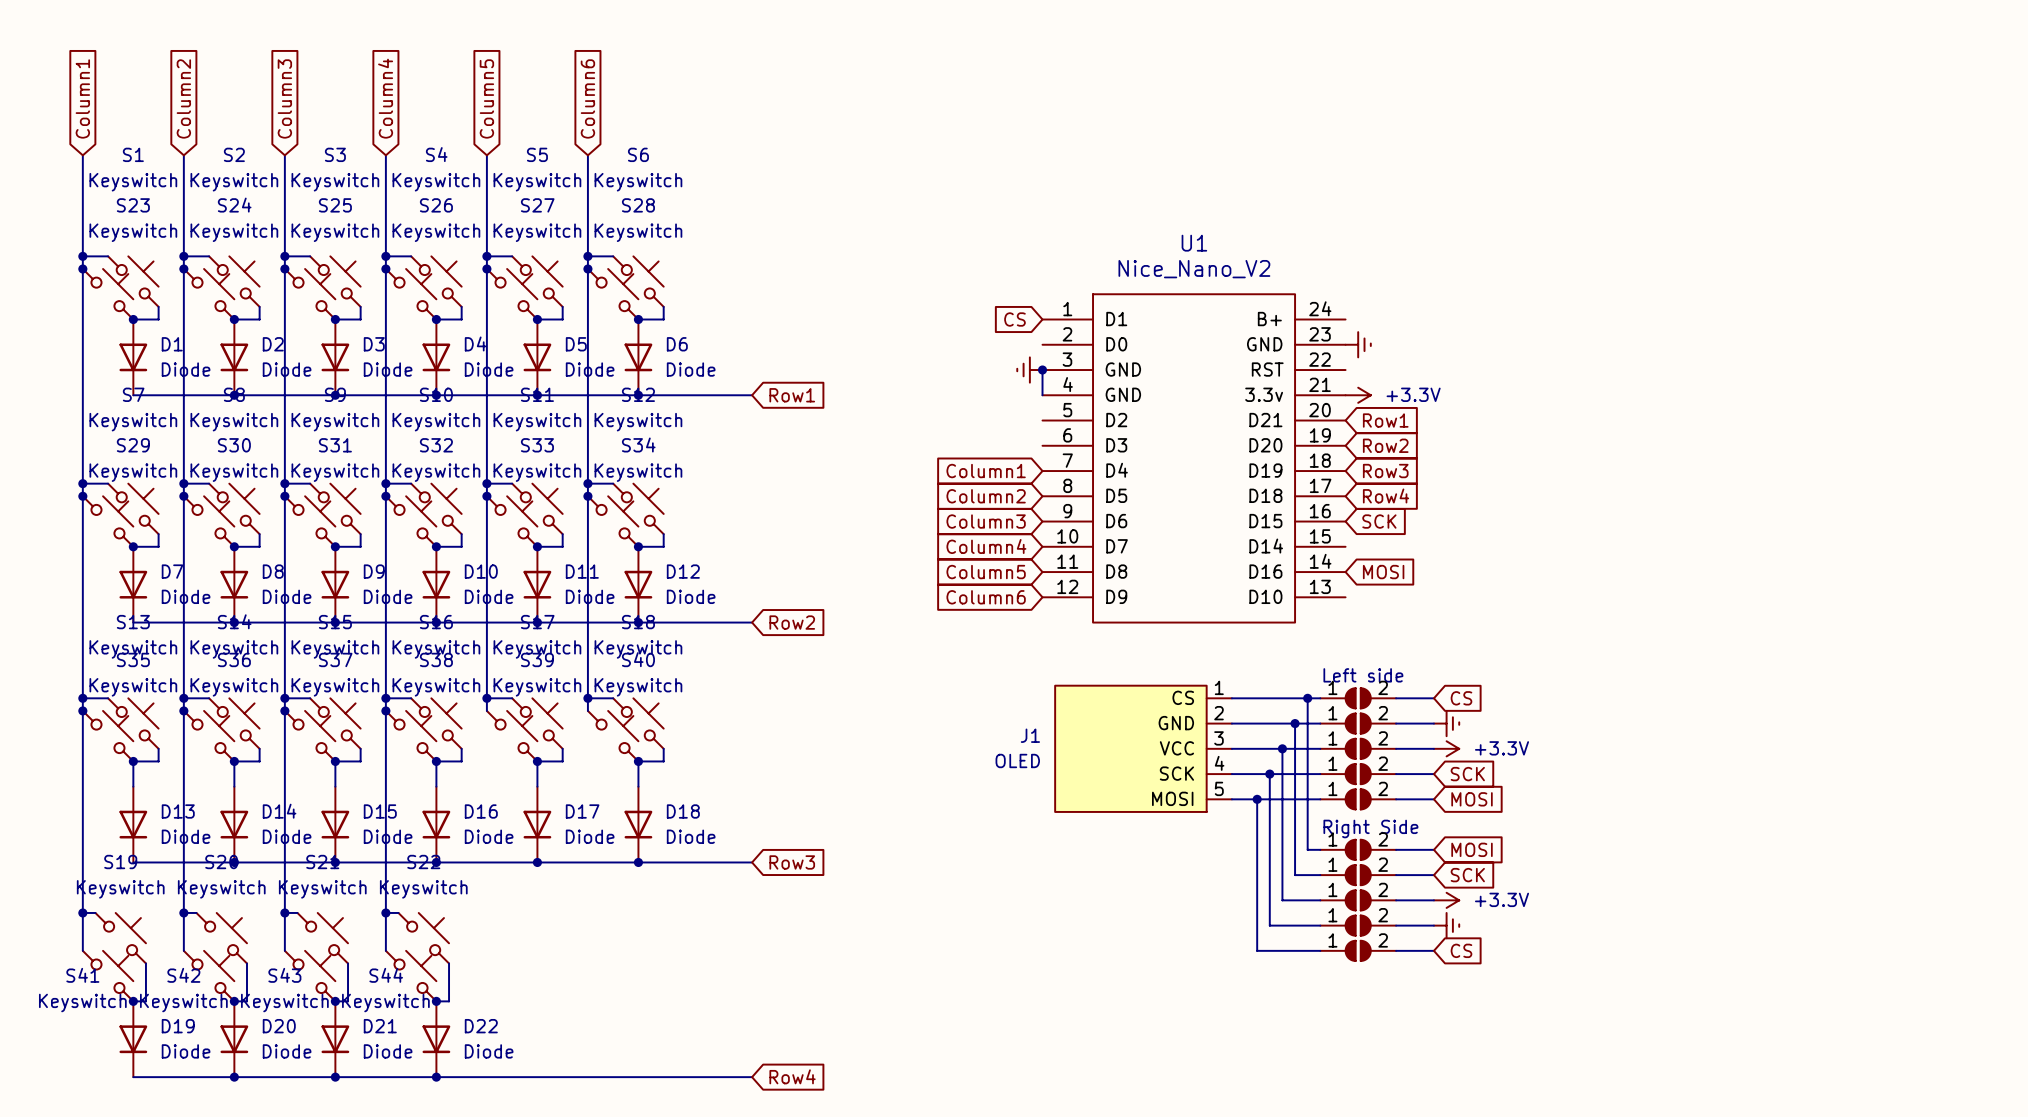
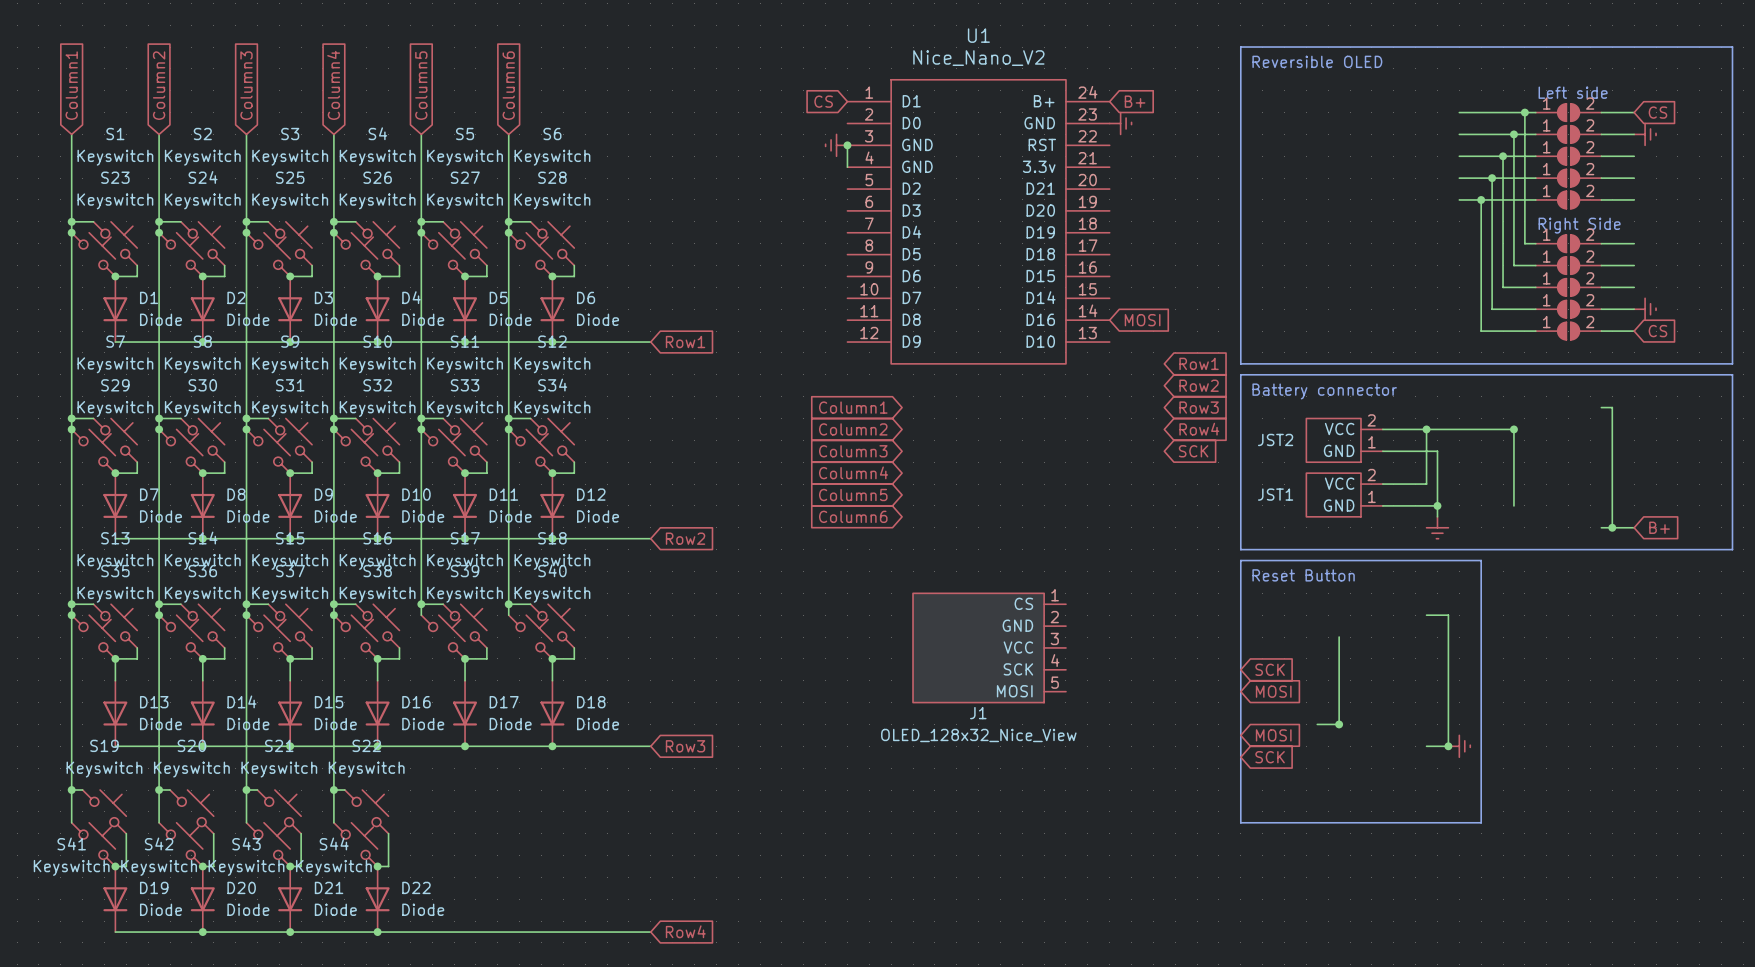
line: none -> (1240, 47) (1240, 363) (1732, 363) (1732, 47) (1240, 47)
text: none -> Reversible OLED (1317, 61)
text: none -> Left side (1573, 92)
global label: none -> B+ (1135, 101)
wire: none -> (1459, 112) (1535, 112)
wire: none -> (1524, 112) (1524, 243) (1535, 243)
junction: none -> (1524, 112)
part: none -> (1568, 112)
wire: none -> (1601, 112) (1634, 112)
global label: none -> CS (1657, 112)
power symbol: none -> (1120, 123)
wire: none -> (1459, 134) (1535, 134)
wire: none -> (1513, 134) (1513, 265) (1535, 265)
junction: none -> (1513, 134)
part: none -> (1568, 134)
wire: none -> (1601, 134) (1634, 134)
power symbol: none -> (1645, 134)
power symbol: none -> (836, 145)
junction: none -> (847, 145)
wire: none -> (1459, 156) (1535, 156)
wire: none -> (1503, 156) (1503, 287) (1535, 287)
junction: none -> (1503, 156)
part: none -> (1568, 156)
wire: none -> (1601, 156) (1634, 156)
wire: none -> (1459, 178) (1535, 178)
wire: none -> (1492, 178) (1492, 309) (1535, 309)
junction: none -> (1492, 178)
part: none -> (1568, 178)
wire: none -> (1601, 178) (1634, 178)
wire: none -> (1459, 199) (1535, 199)
wire: none -> (1481, 199) (1481, 331) (1535, 331)
junction: none -> (1481, 199)
part: none -> (1568, 199)
wire: none -> (1601, 199) (1634, 199)
text: none -> Right Side (1579, 225)
part: none -> (1568, 243)
wire: none -> (1601, 243) (1634, 243)
part: none -> (1568, 265)
wire: none -> (1601, 265) (1634, 265)
global label position: CS (1014, 319) -> CS (823, 101)
part: none -> (1568, 287)
wire: none -> (1601, 287) (1634, 287)
power symbol: (1358, 344) -> none
part: none -> (1568, 309)
wire: none -> (1601, 309) (1634, 309)
power symbol: none -> (1645, 309)
power symbol: (1029, 370) -> none
wire: (1042, 370) (1042, 395) -> (847, 145) (847, 167)
junction: (1042, 370) -> none
part: none -> (1568, 331)
wire: none -> (1601, 331) (1634, 331)
global label: none -> CS (1657, 331)
power symbol: +3.3V (1358, 395) -> none
line: none -> (1240, 374) (1240, 549) (1732, 549) (1732, 374) (1240, 374)
text: none -> Battery connector (1324, 391)
U1 position: (1194, 458) -> (978, 221)
wire: none -> (1601, 407) (1612, 407) (1612, 527)
wire: none -> (1382, 429) (1513, 429) (1513, 505)
wire: none -> (1426, 429) (1426, 484) (1382, 484)
junction: none -> (1426, 429)
junction: none -> (1513, 429)
JST2: none -> (1344, 440)
wire: none -> (1382, 451) (1437, 451) (1437, 516)
global label position: MOSI (1383, 572) -> MOSI (1142, 320)
JST1: none -> (1344, 494)
wire: none -> (1382, 505) (1437, 505)
junction: none -> (1437, 505)
power symbol: none -> (1437, 527)
wire: none -> (1601, 527) (1634, 527)
junction: none -> (1612, 527)
global label: none -> B+ (1659, 527)
line: none -> (1240, 560) (1481, 560) (1481, 822) (1240, 822) (1240, 560)
text: none -> Reset Button (1303, 575)
text: Left side (1363, 675) -> none
wire: (1231, 698) (1320, 698) -> none
wire: (1307, 698) (1307, 849) (1320, 849) -> none
junction: (1307, 698) -> none
part: (1358, 698) -> none
wire: (1396, 698) (1433, 698) -> none
global label: CS (1461, 698) -> none
wire: none -> (1426, 615) (1448, 615) (1448, 746) (1426, 746)
wire: (1231, 723) (1320, 723) -> none
wire: (1295, 723) (1295, 875) (1320, 875) -> none
junction: (1295, 723) -> none
part: (1358, 723) -> none
wire: (1396, 723) (1433, 723) -> none
power symbol: (1446, 723) -> none
J1 name position: J1 (1030, 735) -> J1 (978, 713)
wire: none -> (1339, 637) (1339, 724) (1317, 724)
wire: (1231, 748) (1320, 748) -> none
wire: (1282, 748) (1282, 900) (1320, 900) -> none
junction: (1282, 748) -> none
part: (1358, 748) -> none
wire: (1396, 748) (1433, 748) -> none
power symbol: +3.3V (1446, 748) -> none
J1 value: OLED (1017, 760) -> OLED_128x32_Nice_View (978, 735)
wire: (1231, 774) (1320, 774) -> none
wire: (1269, 774) (1269, 925) (1320, 925) -> none
junction: (1269, 774) -> none
part: (1358, 774) -> none
wire: (1396, 774) (1433, 774) -> none
wire: (1231, 799) (1320, 799) -> none
wire: (1257, 799) (1257, 950) (1320, 950) -> none
junction: (1257, 799) -> none
part: (1358, 799) -> none
wire: (1396, 799) (1433, 799) -> none
text: Right Side (1370, 828) -> none
junction: none -> (1339, 724)
part: (1358, 849) -> none
wire: (1396, 849) (1433, 849) -> none
junction: none -> (1448, 746)
power symbol: none -> (1459, 746)
part: (1358, 875) -> none
wire: (1396, 875) (1433, 875) -> none
part: (1358, 900) -> none
wire: (1396, 900) (1433, 900) -> none
power symbol: +3.3V (1446, 900) -> none
part: (1358, 925) -> none
wire: (1396, 925) (1433, 925) -> none
power symbol: (1446, 925) -> none
part: (1358, 950) -> none
wire: (1396, 950) (1433, 950) -> none
global label: CS (1461, 950) -> none

